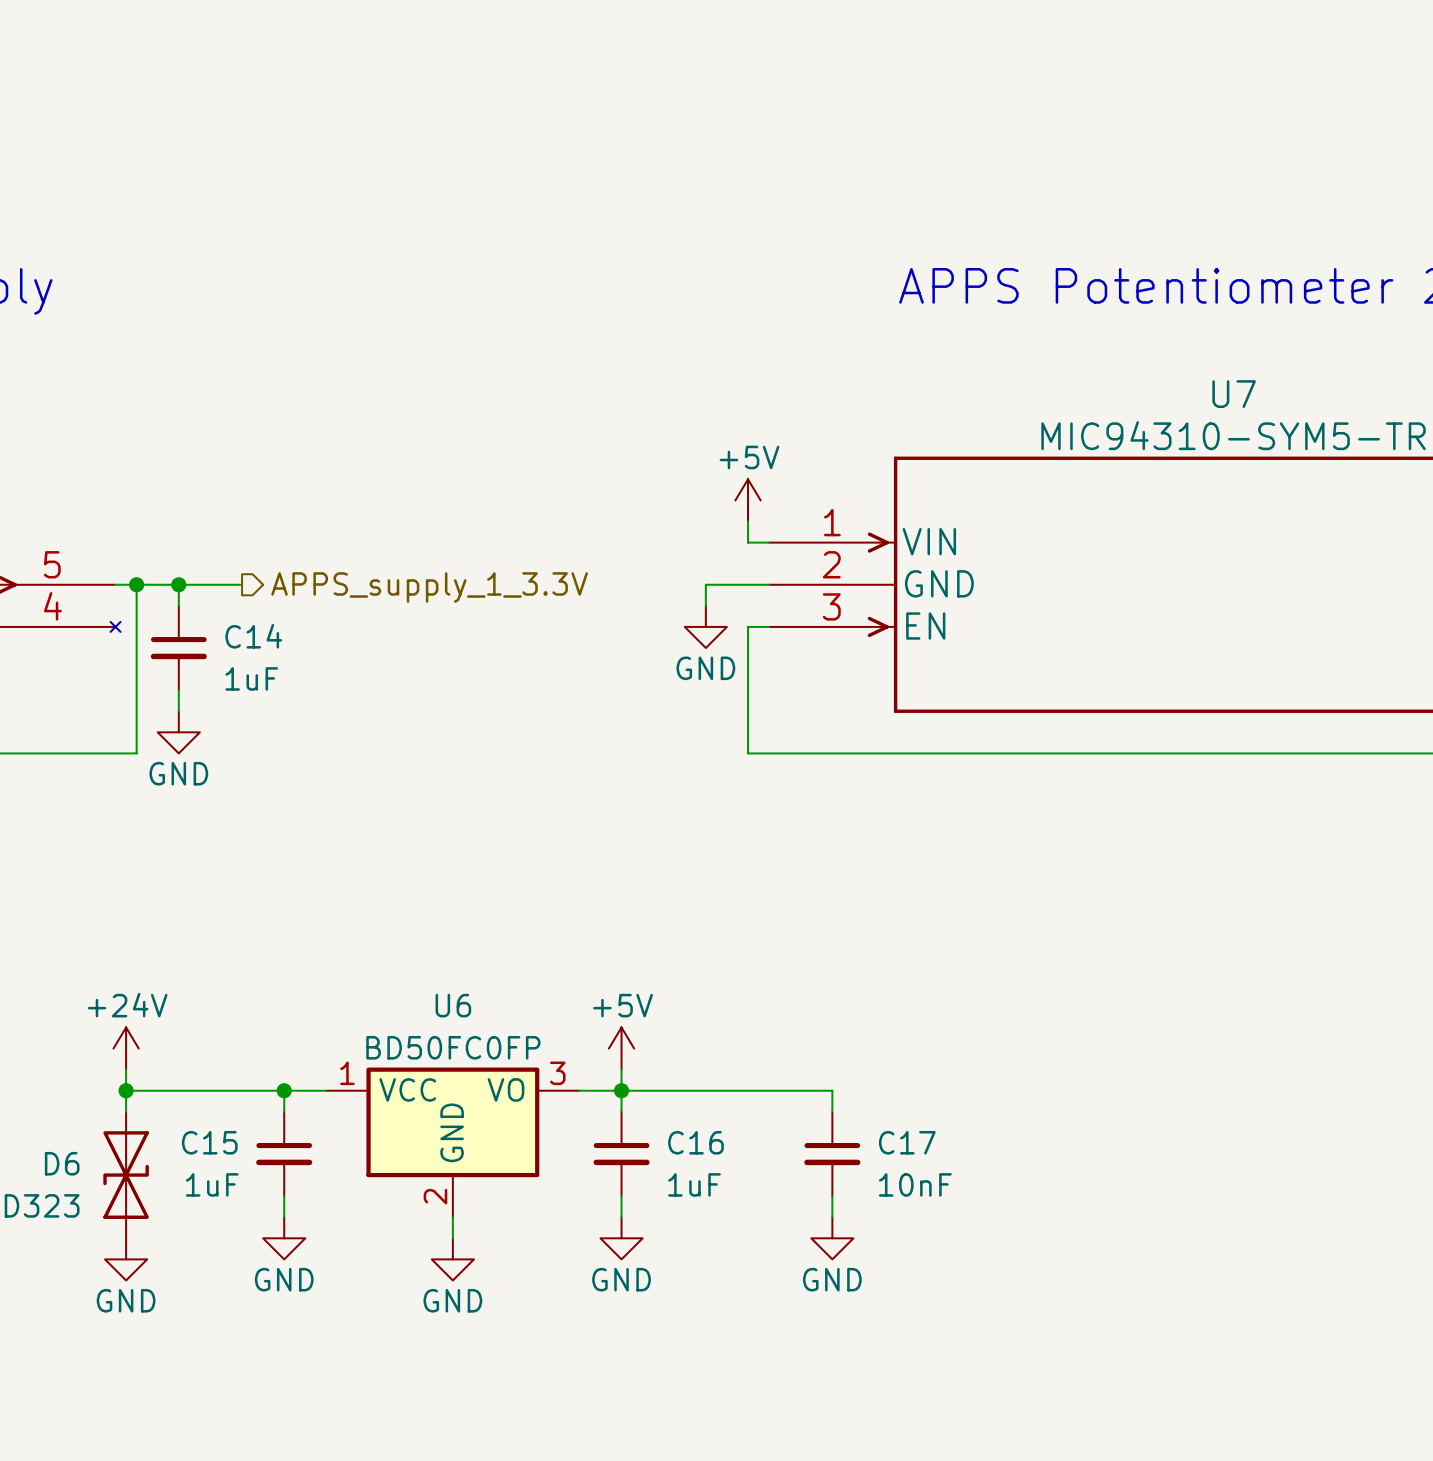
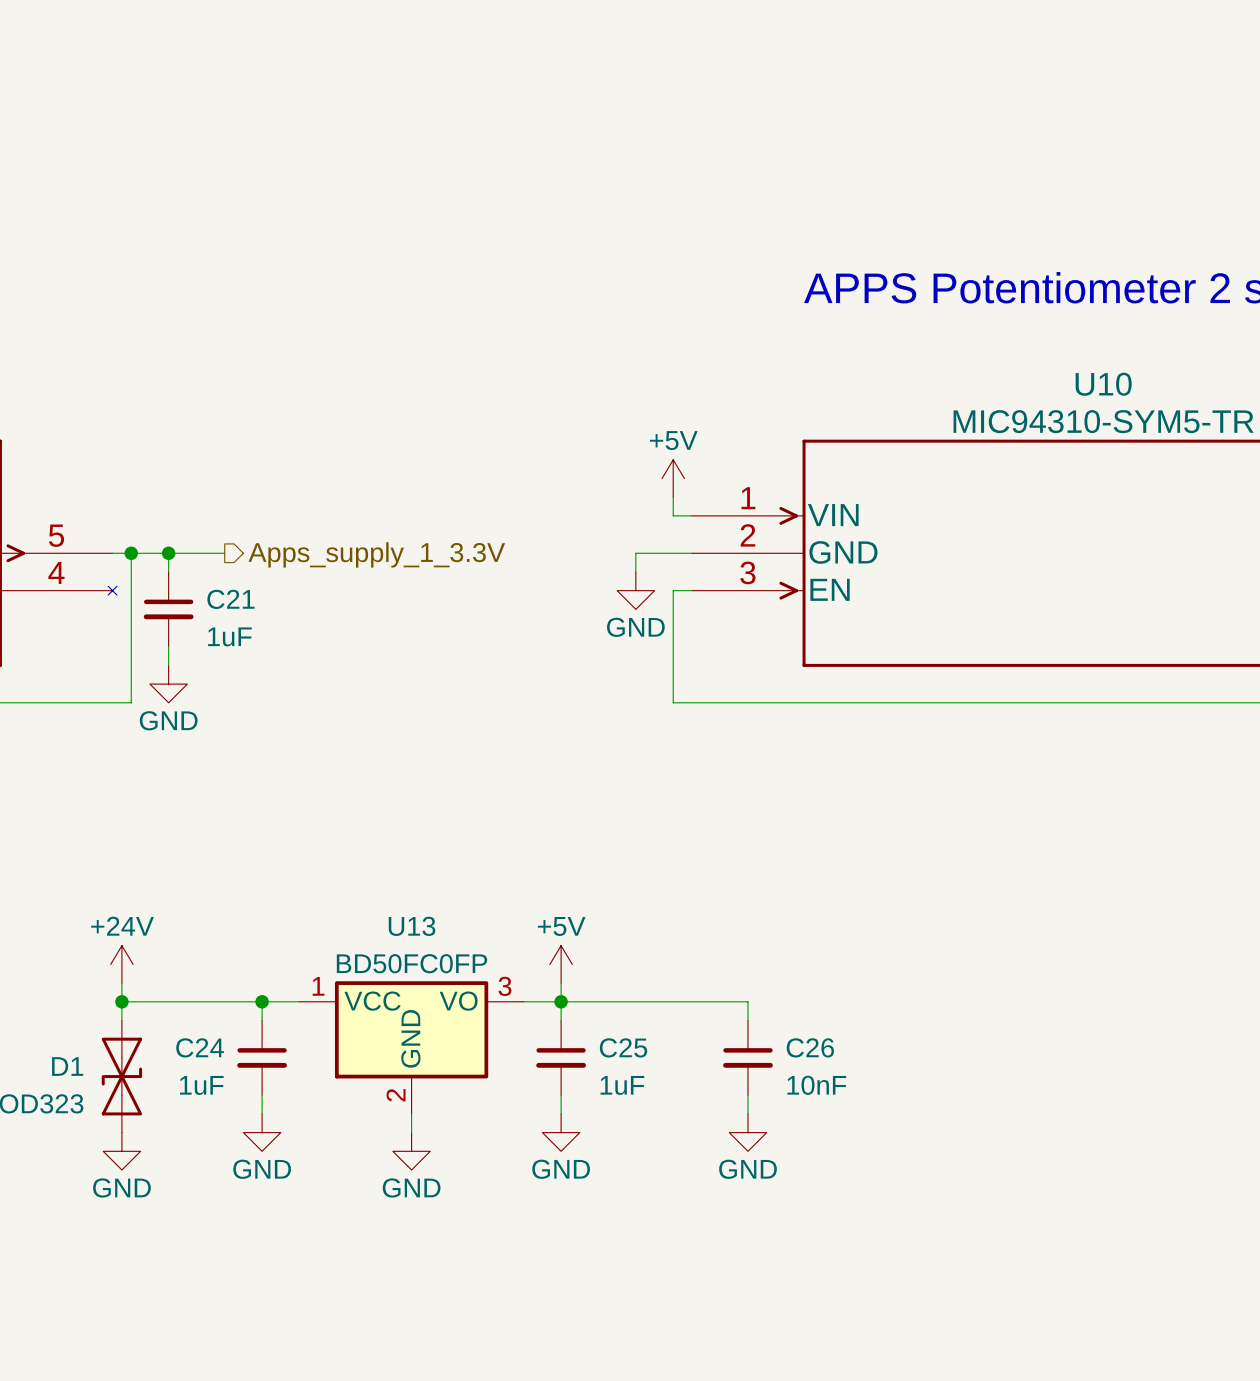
U7 name: U7 (1234, 394) -> U10 (1103, 384)
hierarchical label: APPS_supply_1_3.3V (429, 587) -> Apps_supply_1_3.3V (376, 554)
C14 name: C14 (253, 636) -> C21 (230, 599)
U6 name: U6 (453, 1005) -> U13 (412, 926)
C15 name: C15 (209, 1142) -> C24 (200, 1047)
C16 name: C16 (695, 1142) -> C25 (623, 1047)
C17 name: C17 (907, 1142) -> C26 (810, 1047)
D6 name: D6 (62, 1163) -> D1 (67, 1066)

